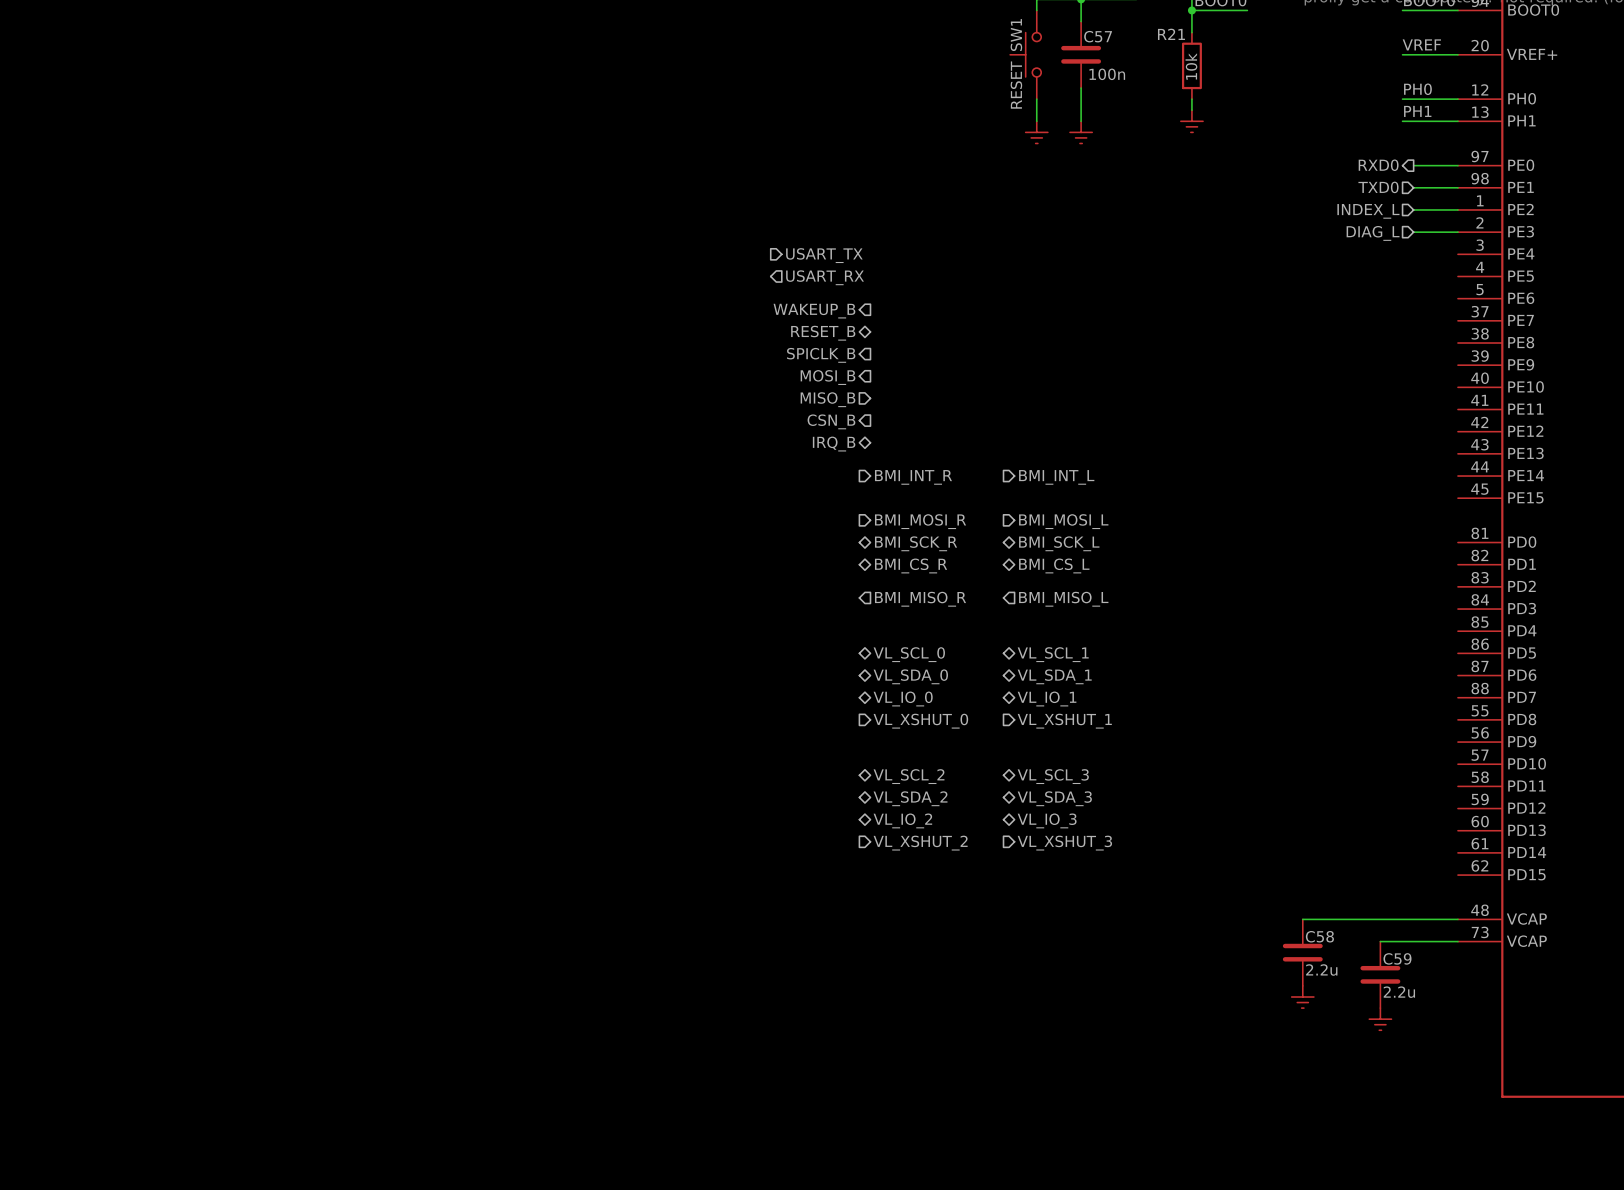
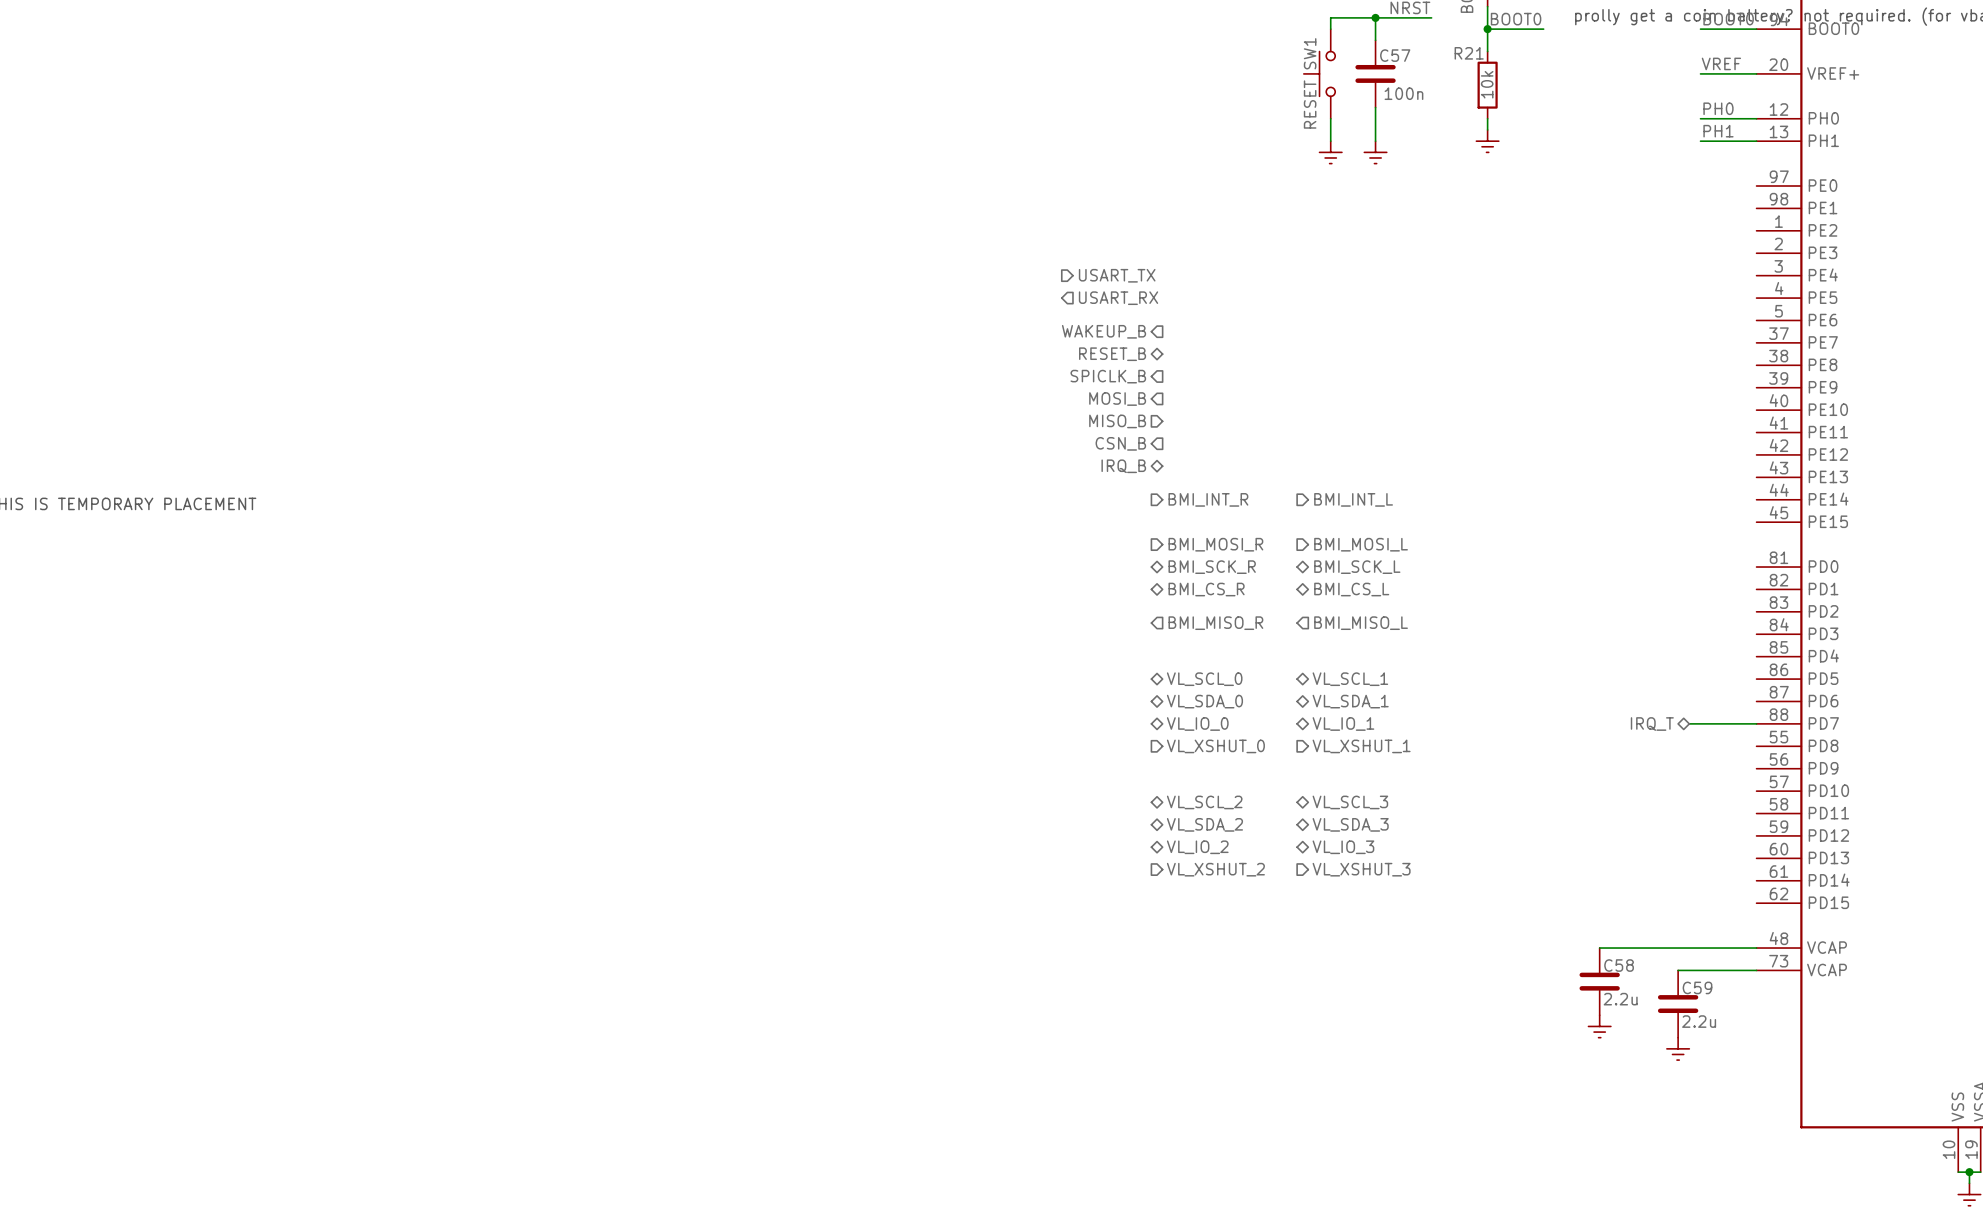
hierarchical label: RXD0 (1378, 165) -> none
wire: (1413, 165) (1457, 165) -> none
hierarchical label: TXD0 (1378, 187) -> none
wire: (1413, 187) (1457, 187) -> none
wire: (1413, 209) (1457, 209) -> none
hierarchical label: INDEX_L (1368, 211) -> none
wire: (1413, 232) (1457, 232) -> none
hierarchical label: DIAG_L (1373, 233) -> none
wire: none -> (1689, 723) (1756, 723)
hierarchical label: none -> IRQ_T (1652, 724)

